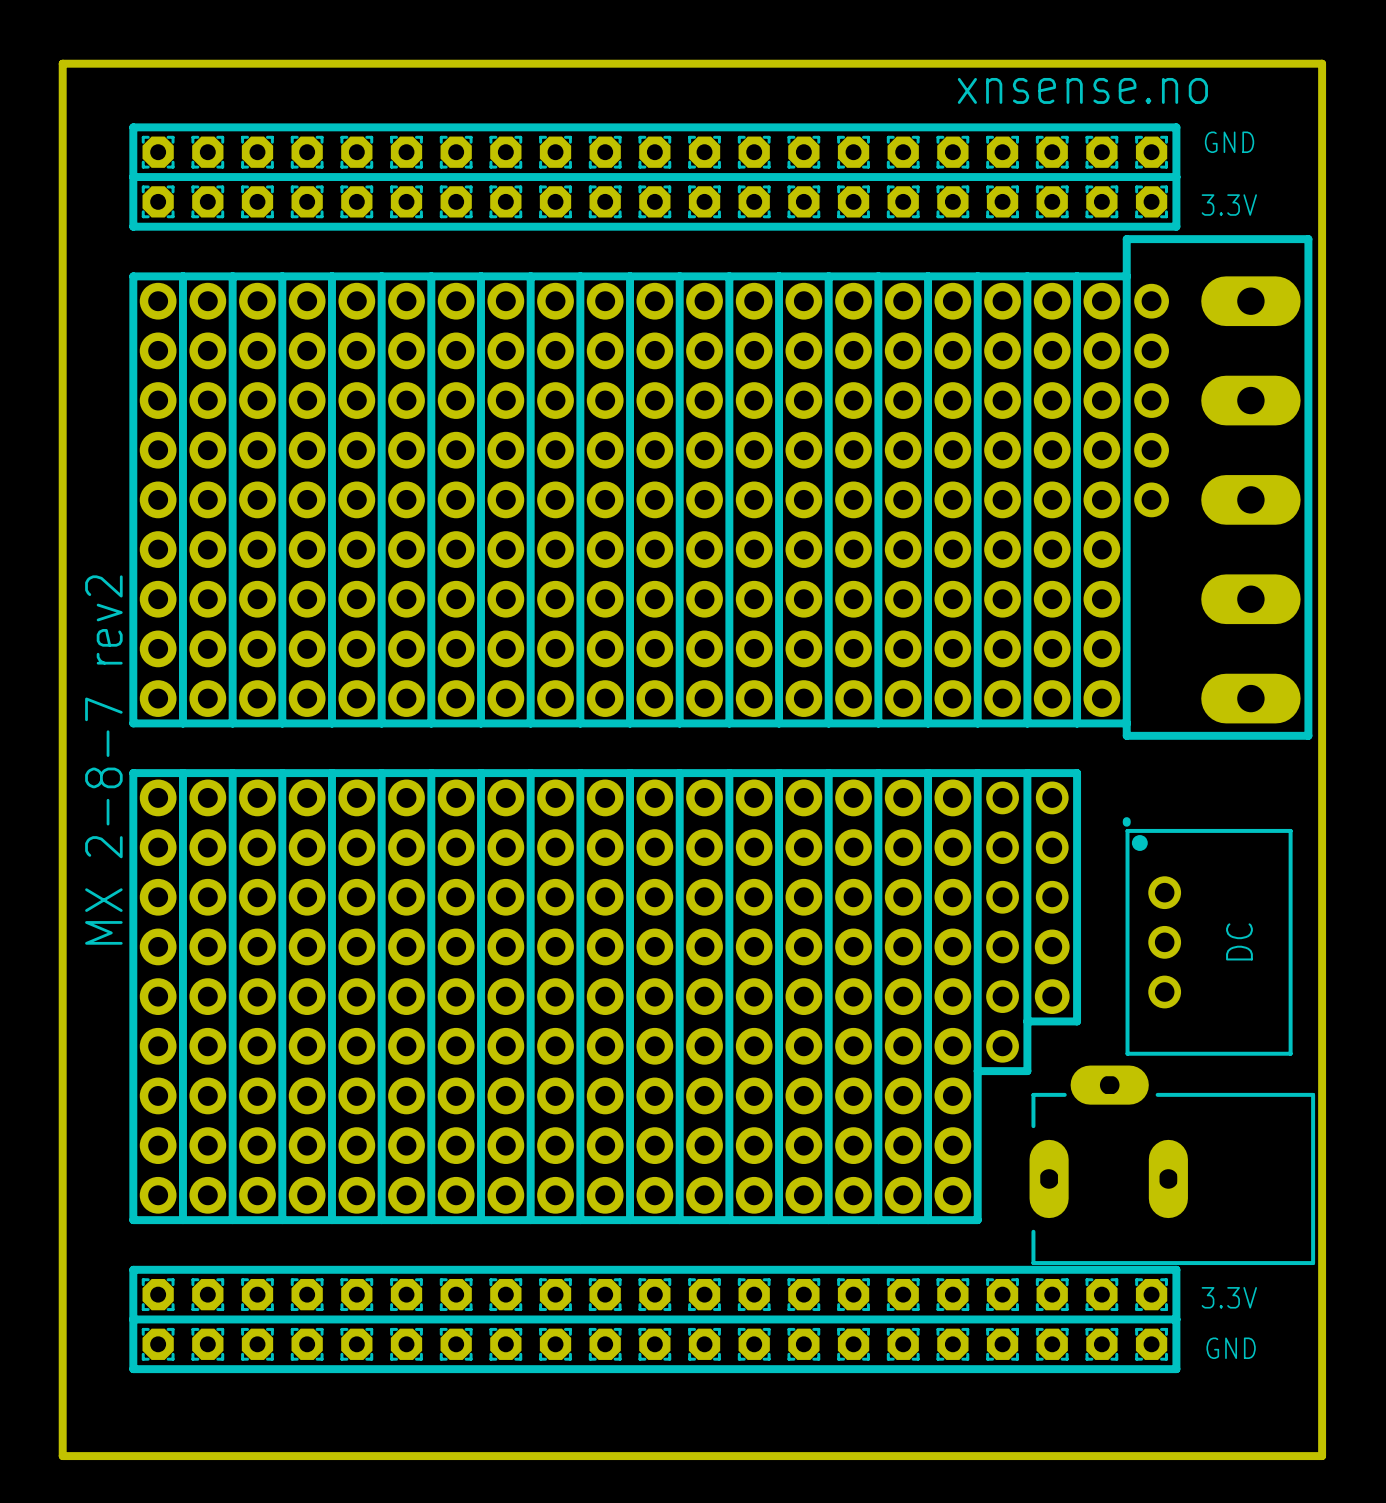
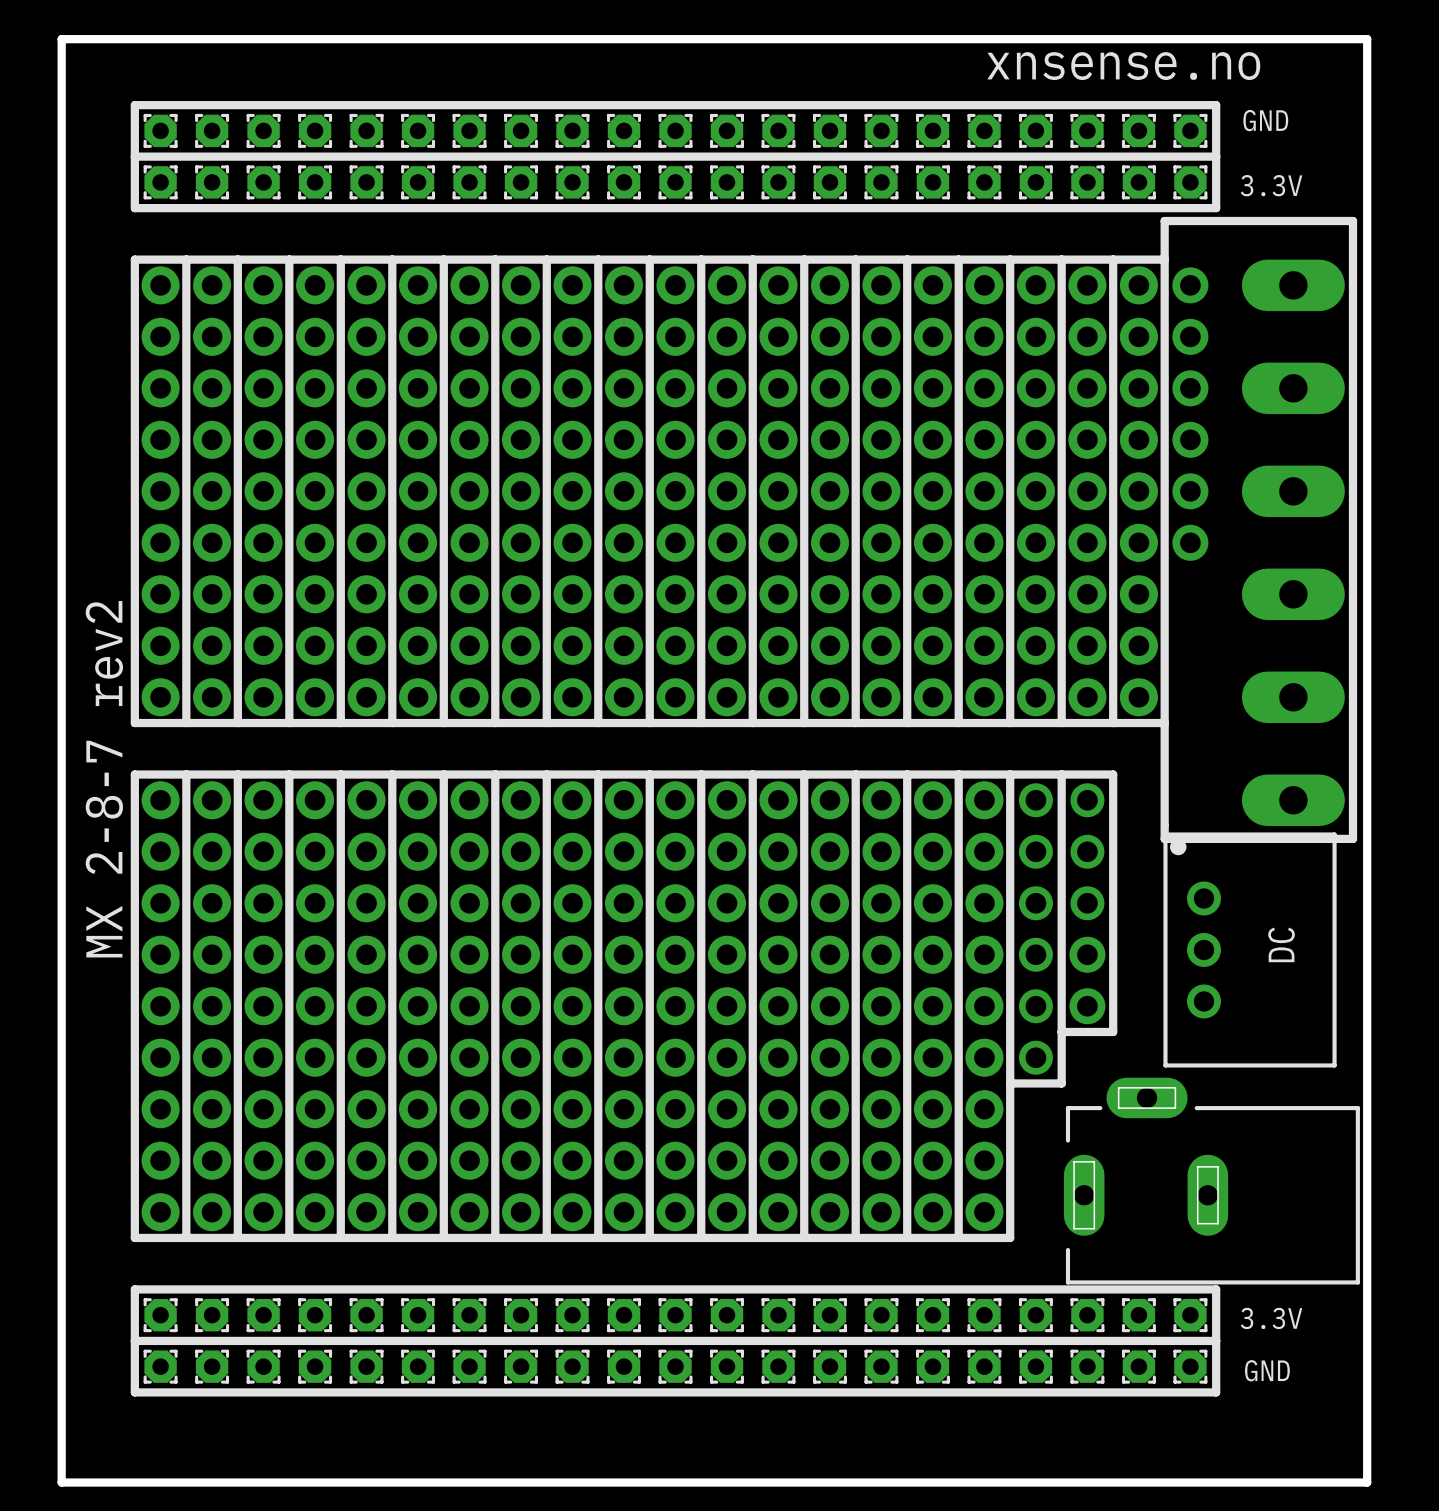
part: none -> (1190, 542)
line: (1126, 735) (1308, 735) -> (1164, 826) (1164, 838) (1352, 838) (1352, 735)
part: none -> (1293, 800)
line: (1126, 821) (1126, 822) -> (1164, 824) (1164, 735)

